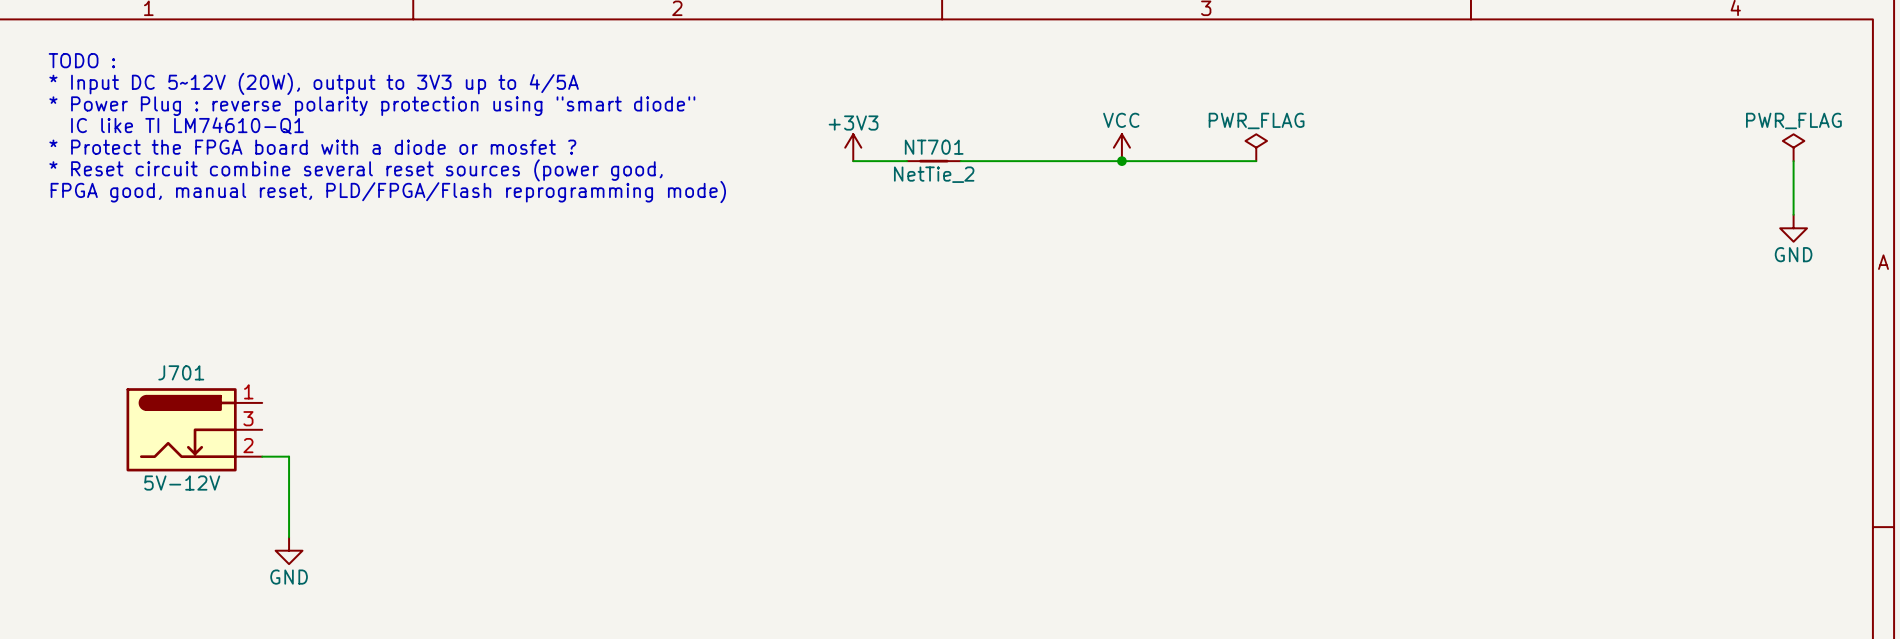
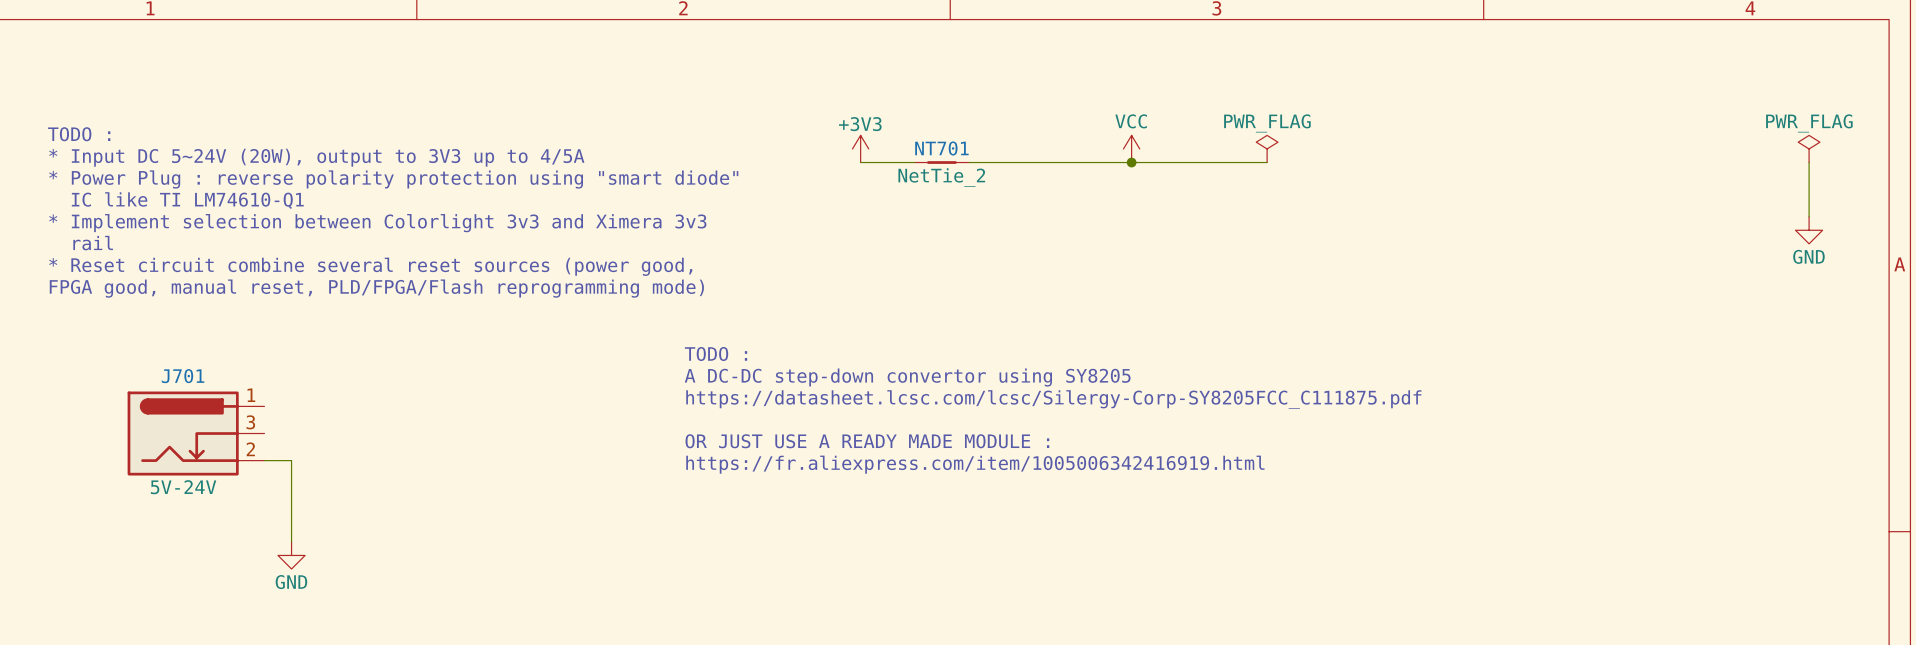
text position: TODO : (81, 60) -> TODO : (79, 134)
text: * Input DC 5~12V (20W), output to 3V3 up to 4/5A (314, 83) -> none
text position: * Power Plug : reverse polarity protection using "smart diode" (372, 106) -> * Power Plug : reverse polarity protection using "smart diode" (393, 179)
text position: IC like TI LM74610-Q1 (187, 125) -> IC like TI LM74610-Q1 (187, 200)
text: * Protect the FPGA board with a diode or mosfet ? (312, 147) -> * Input DC 5~24V (20W), output to 3V3 up to 4/5A (316, 157)
text position: * Reset circuit combine several reset sources (power good, (356, 170) -> * Reset circuit combine several reset sources (power good, (370, 266)
text position: FPGA good, manual reset, PLD/FPGA/Flash reprogramming mode) (388, 192) -> FPGA good, manual reset, PLD/FPGA/Flash reprogramming mode) (376, 288)
text: none -> * Implement selection between Colorlight 3v3 and Ximera 3v3 (377, 223)
text: none -> rail (93, 243)
text: none -> TODO : (716, 353)
text: none -> A DC-DC step-down convertor using SY8205 (907, 377)
text: none -> https://datasheet.lcsc.com/lcsc/Silergy-Corp-SY8205FCC_C111875.pdf (1053, 399)
text: none -> OR JUST USE A READY MADE MODULE : (867, 441)
text: none -> https://fr.aliexpress.com/item/1005006342416919.html (975, 464)
J701 value: 5V-12V (182, 483) -> 5V-24V (183, 487)

